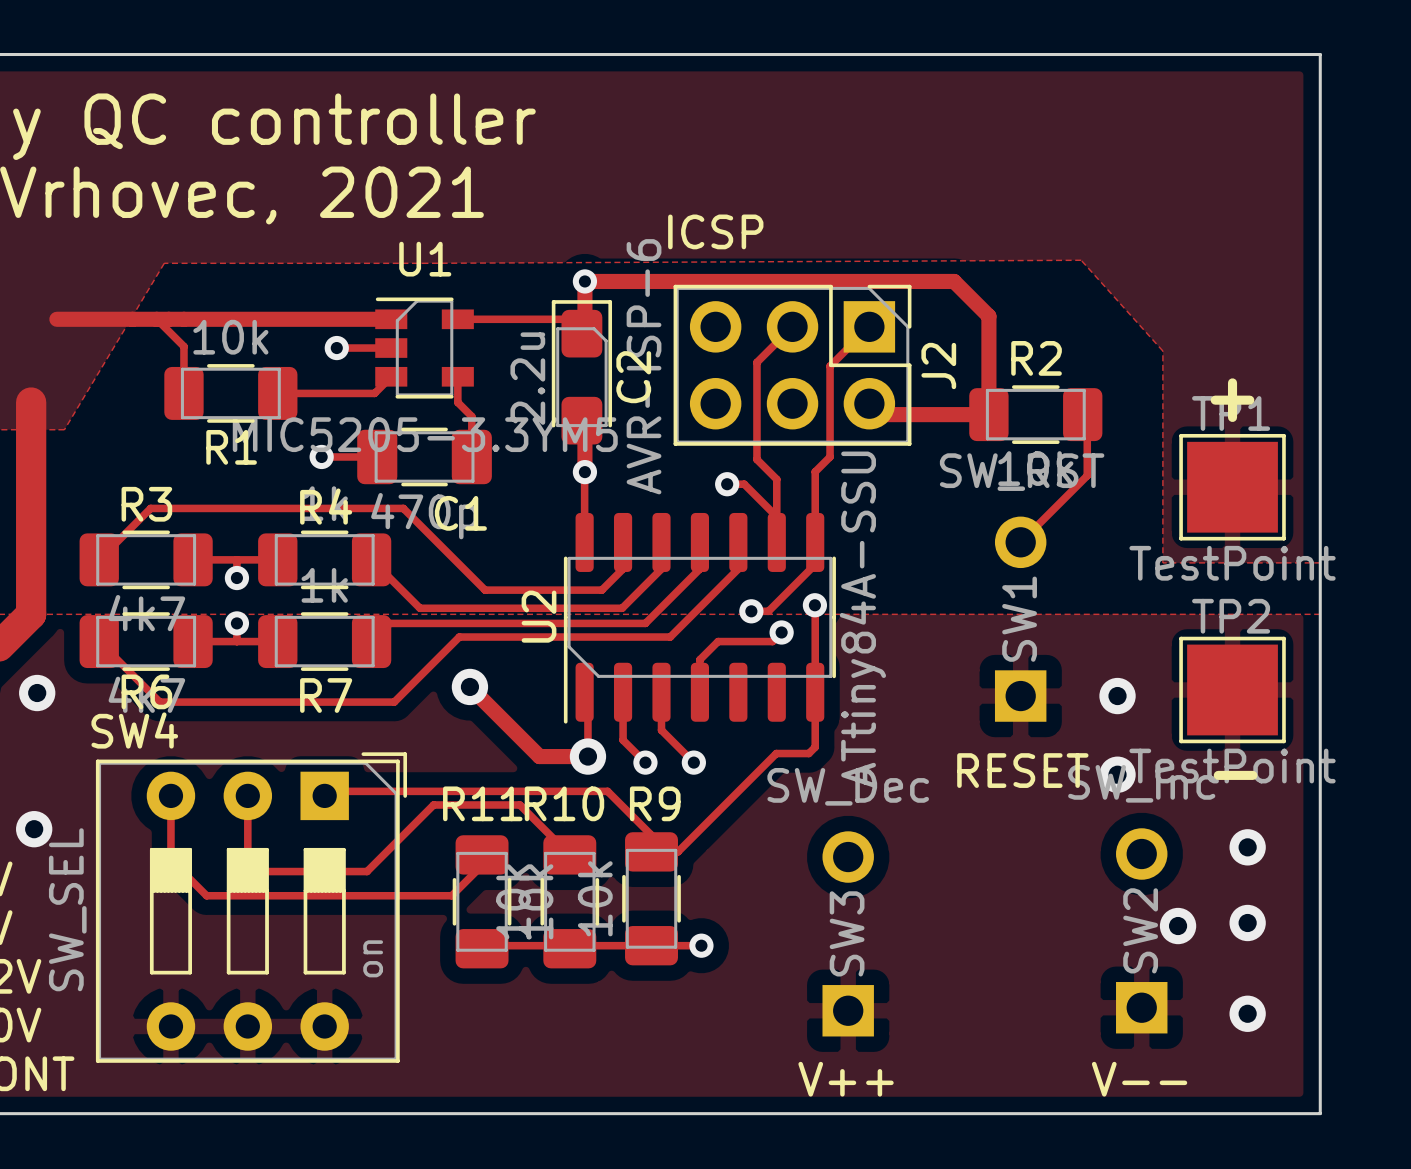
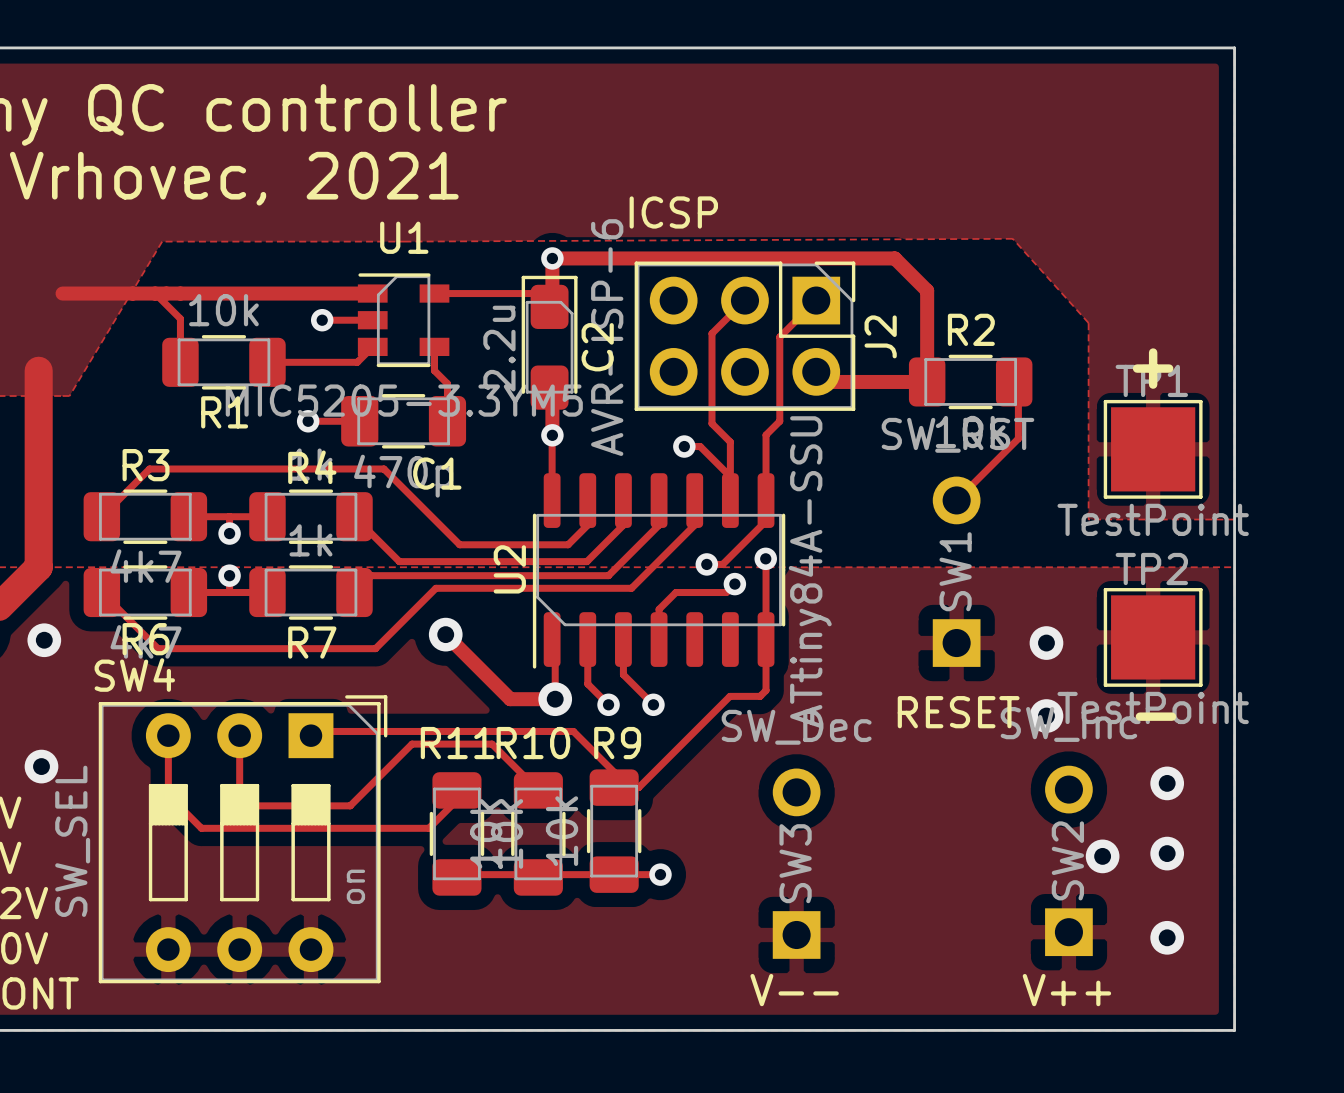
text position: V++ (846, 1079) -> V++ (1066, 990)
text position: V-- (1139, 1079) -> V-- (794, 990)

